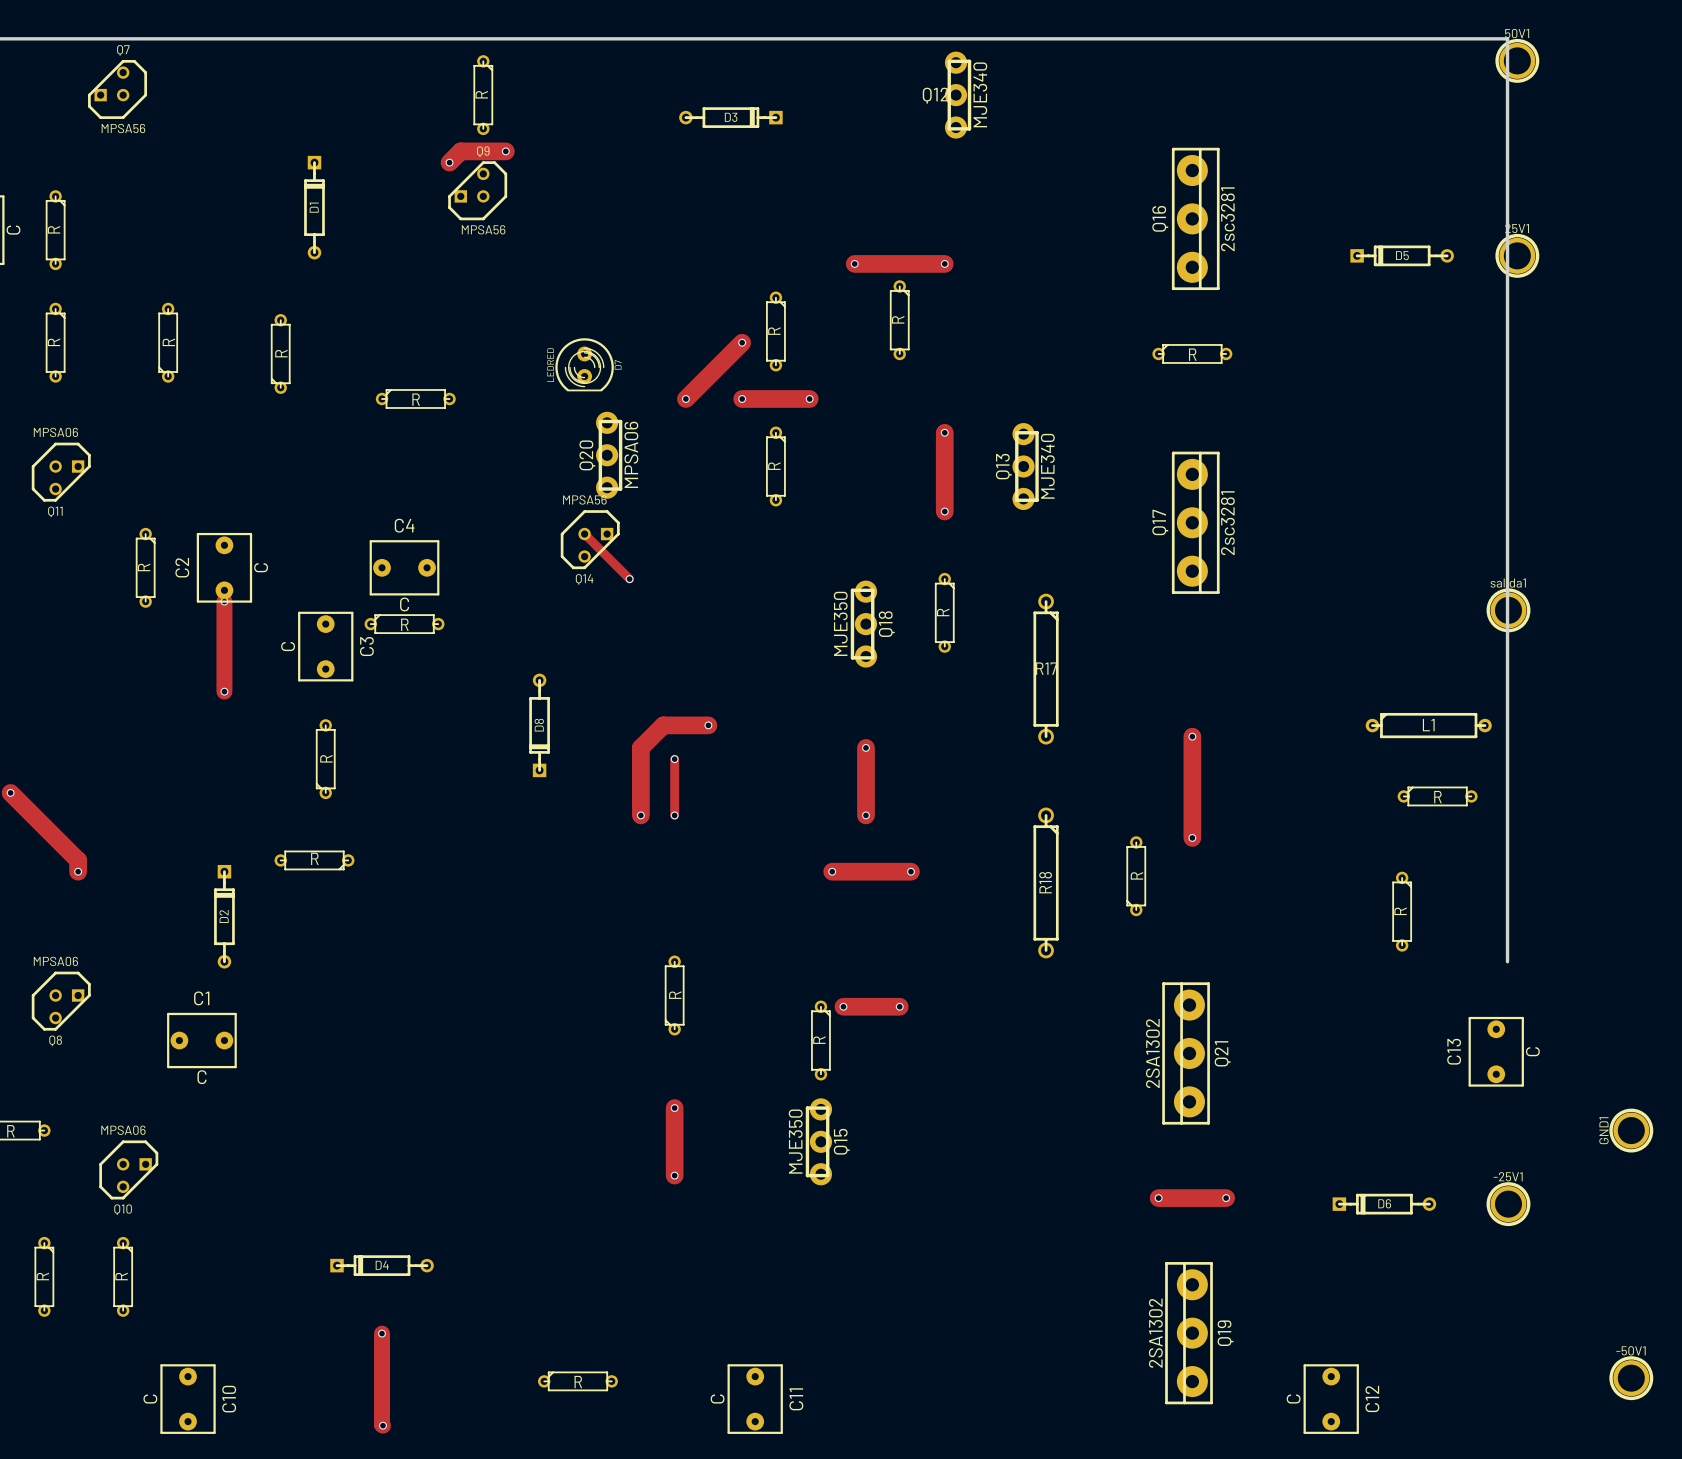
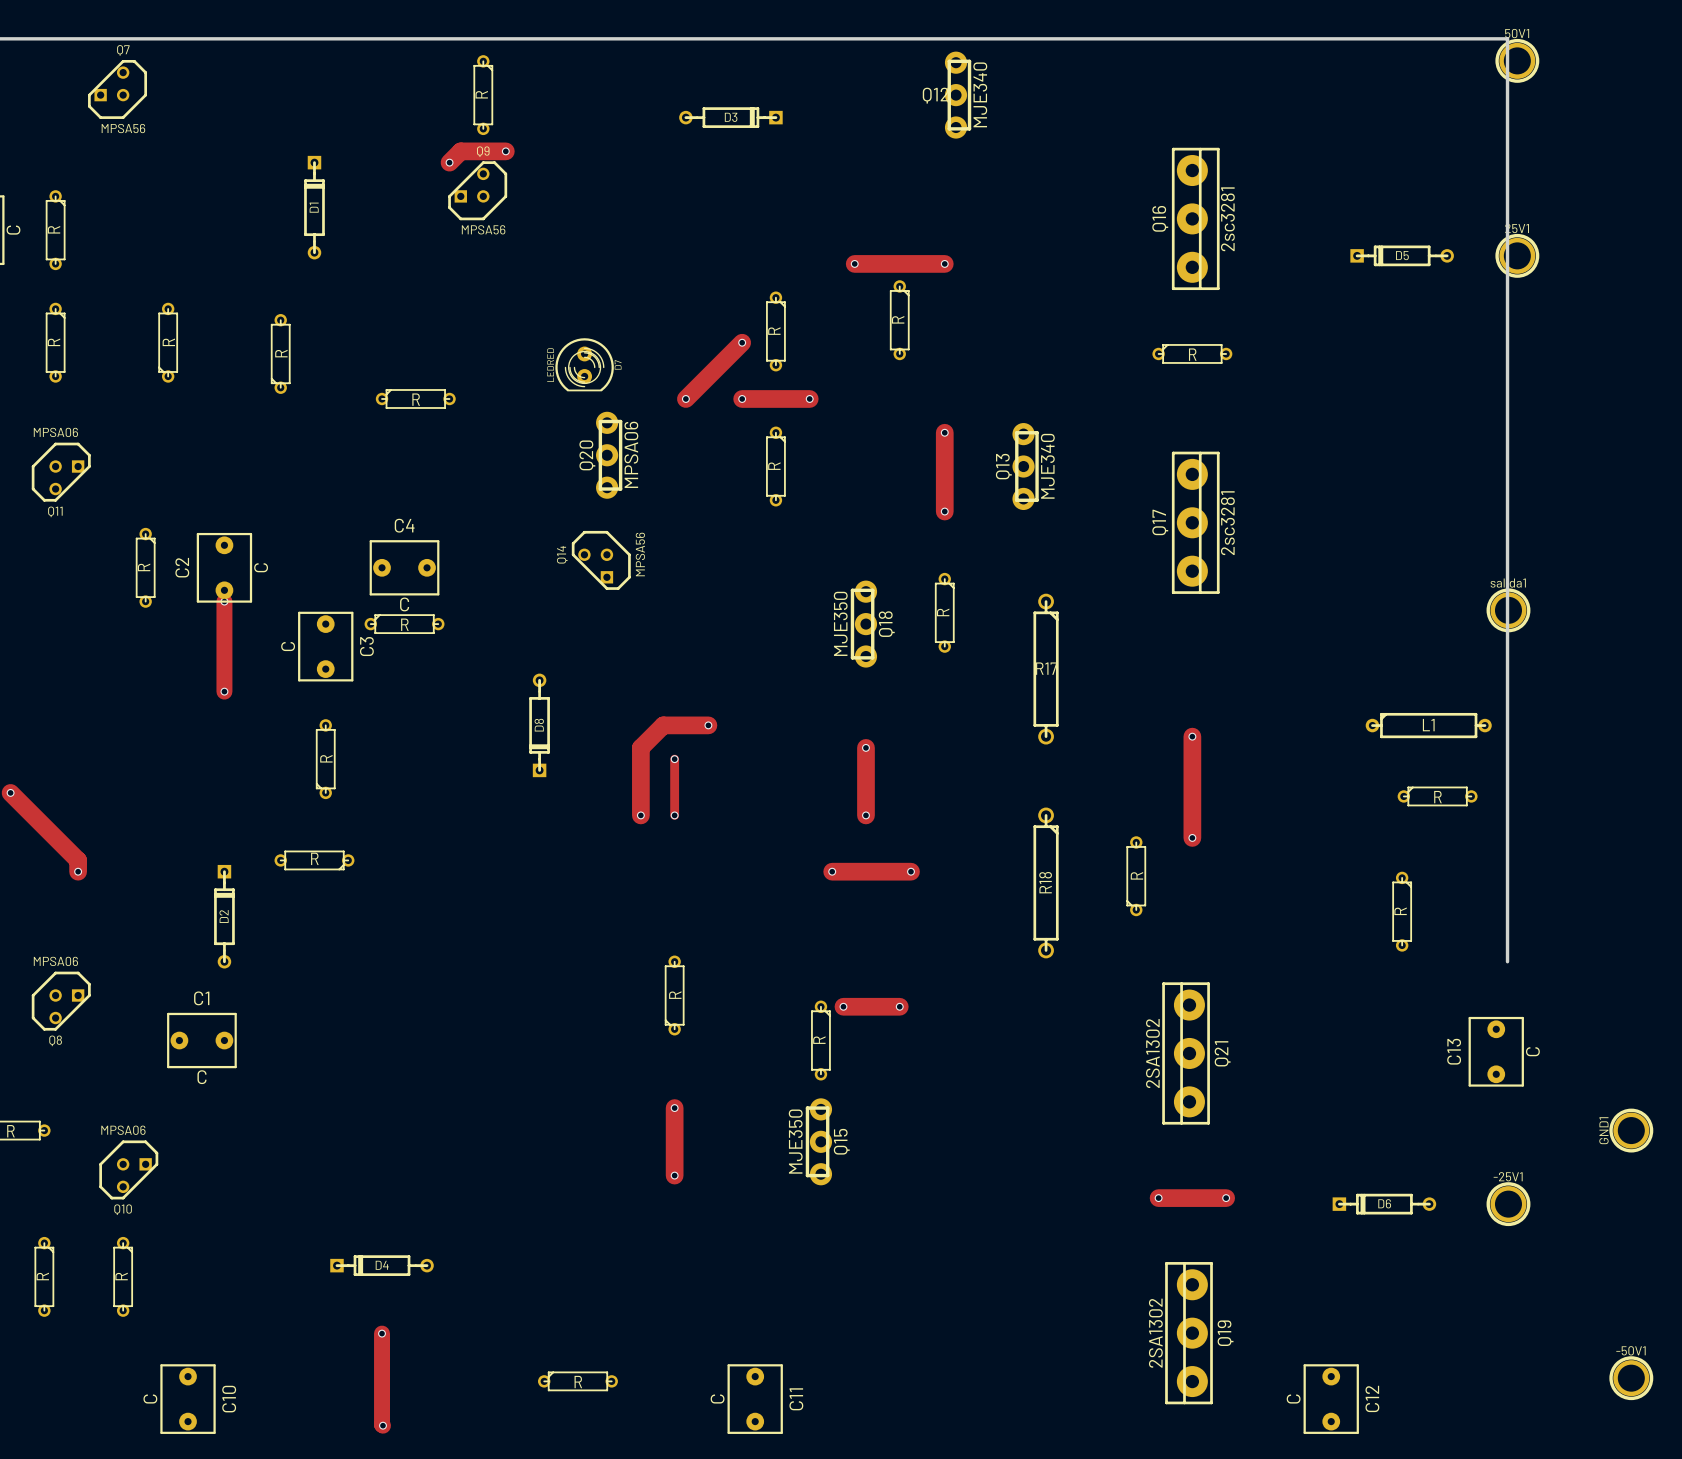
track: (584, 534) (629, 579) -> none
Q14 rotation: 0° (590, 539) -> 90° clockwise (601, 560)
via: (629, 579) -> none

